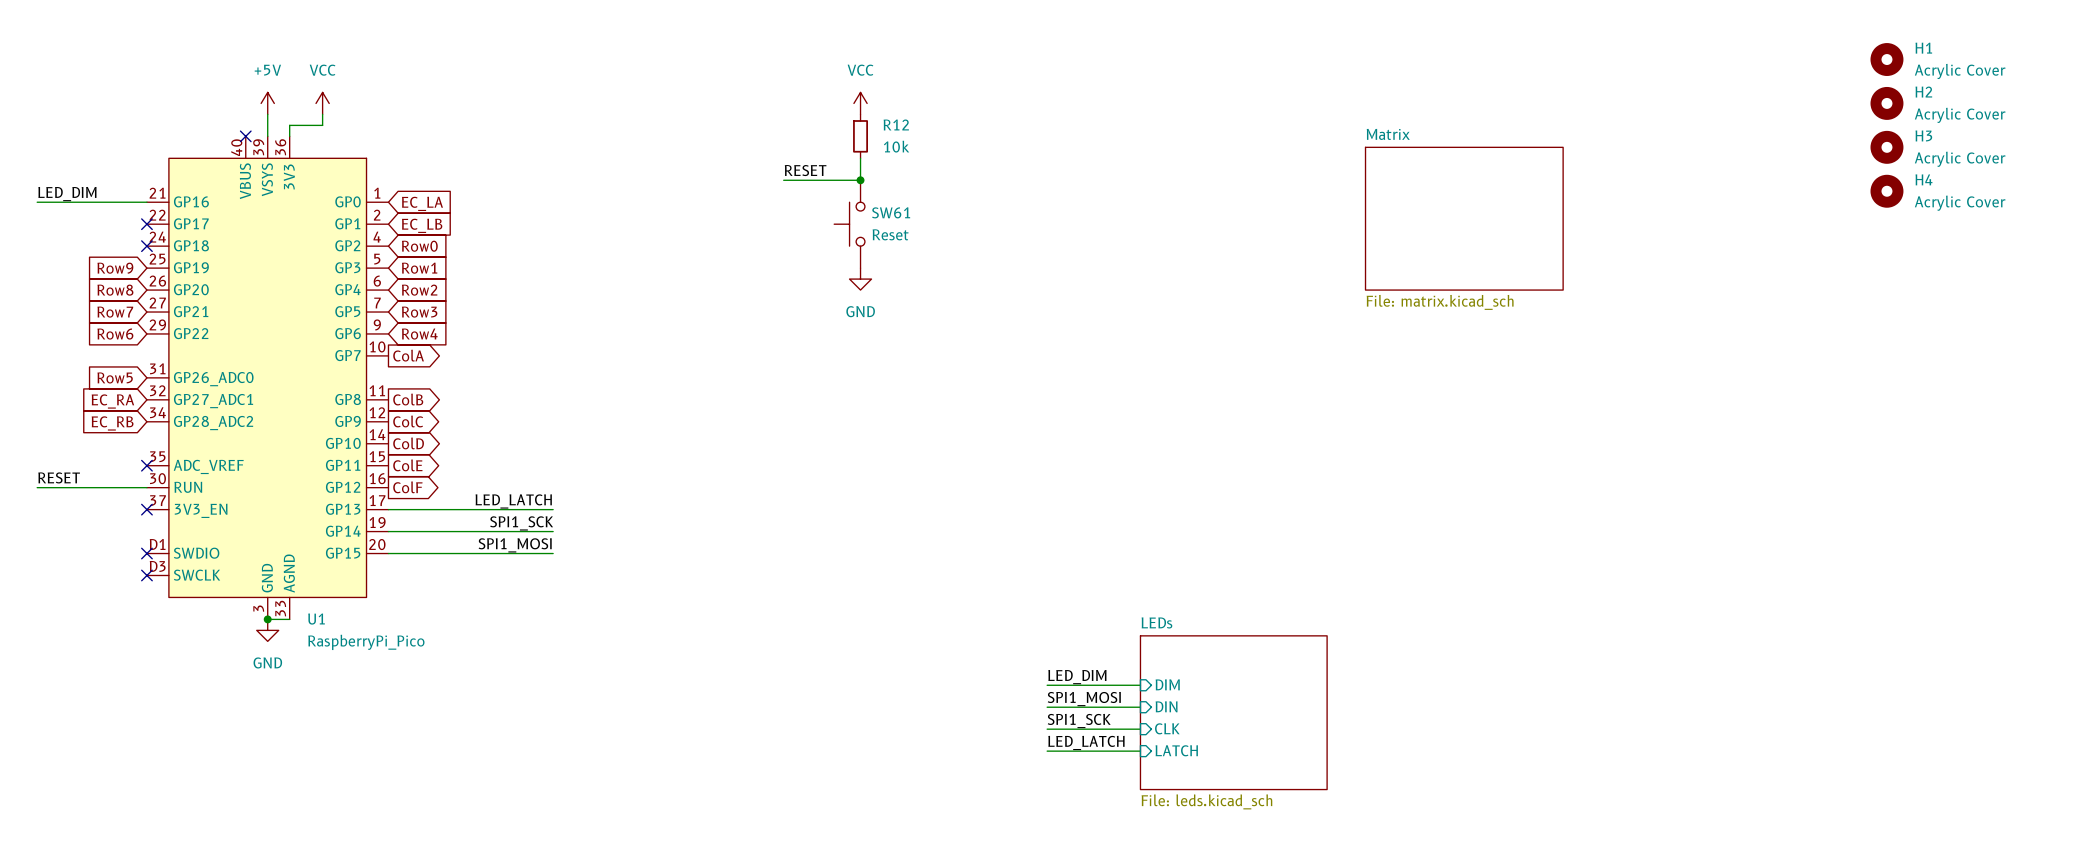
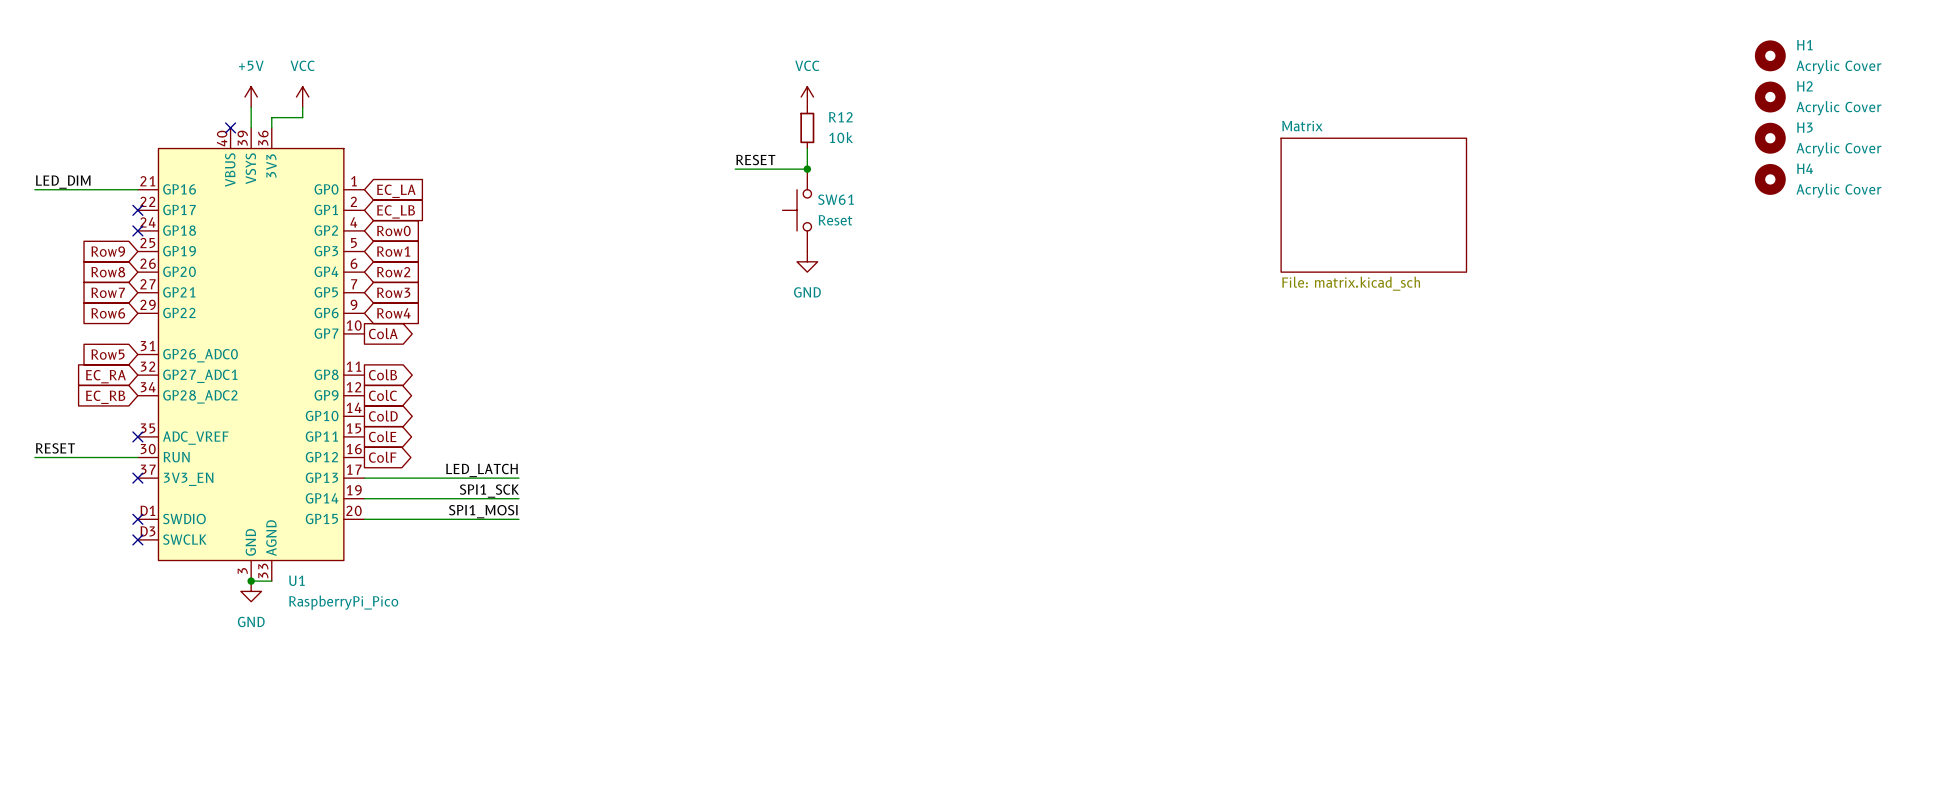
label: LED_DIM (1077, 677) -> none
sheet pin: DIM (1167, 684) -> none
wire: (1047, 685) (1140, 685) -> none
label: SPI1_MOSI (1084, 699) -> none
sheet pin: DIN (1166, 706) -> none
wire: (1047, 707) (1140, 707) -> none
sheet LEDs: File: leds.kicad_sch (1233, 712) -> none
label: SPI1_SCK (1079, 721) -> none
sheet pin: CLK (1167, 728) -> none
wire: (1047, 729) (1140, 729) -> none
label: LED_LATCH (1086, 742) -> none
sheet pin: LATCH (1176, 750) -> none
wire: (1047, 751) (1140, 751) -> none

